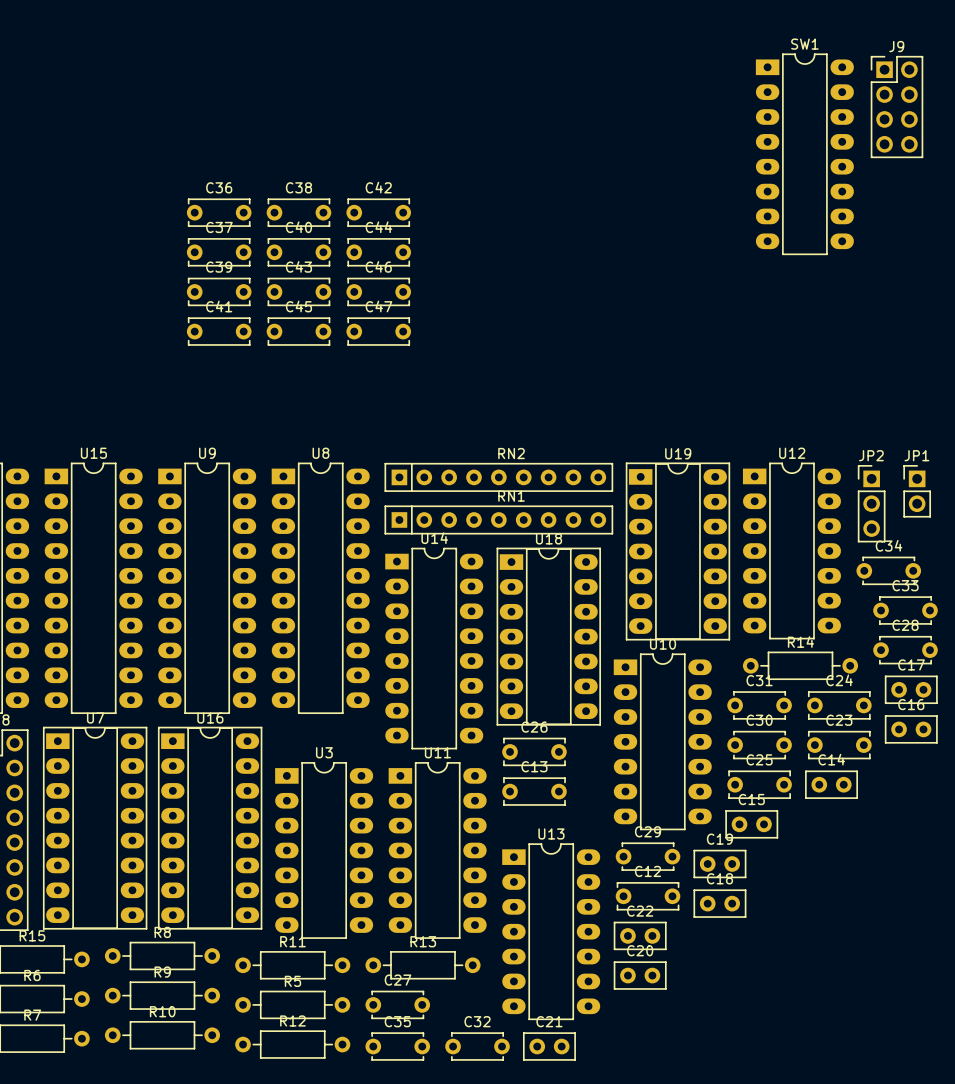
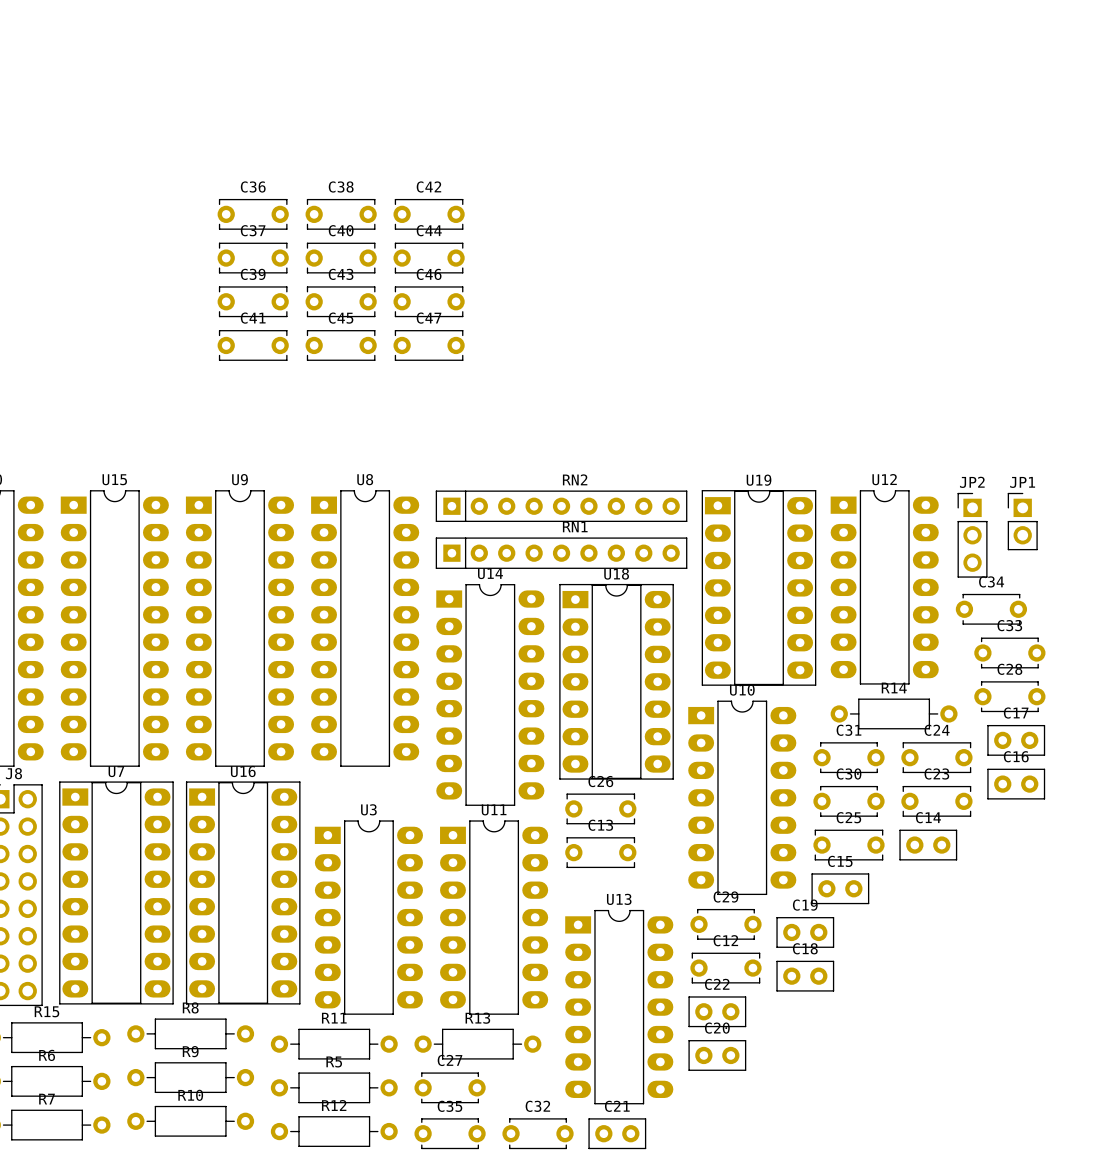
J9: (896, 107) -> none
SW1: (804, 154) -> none

